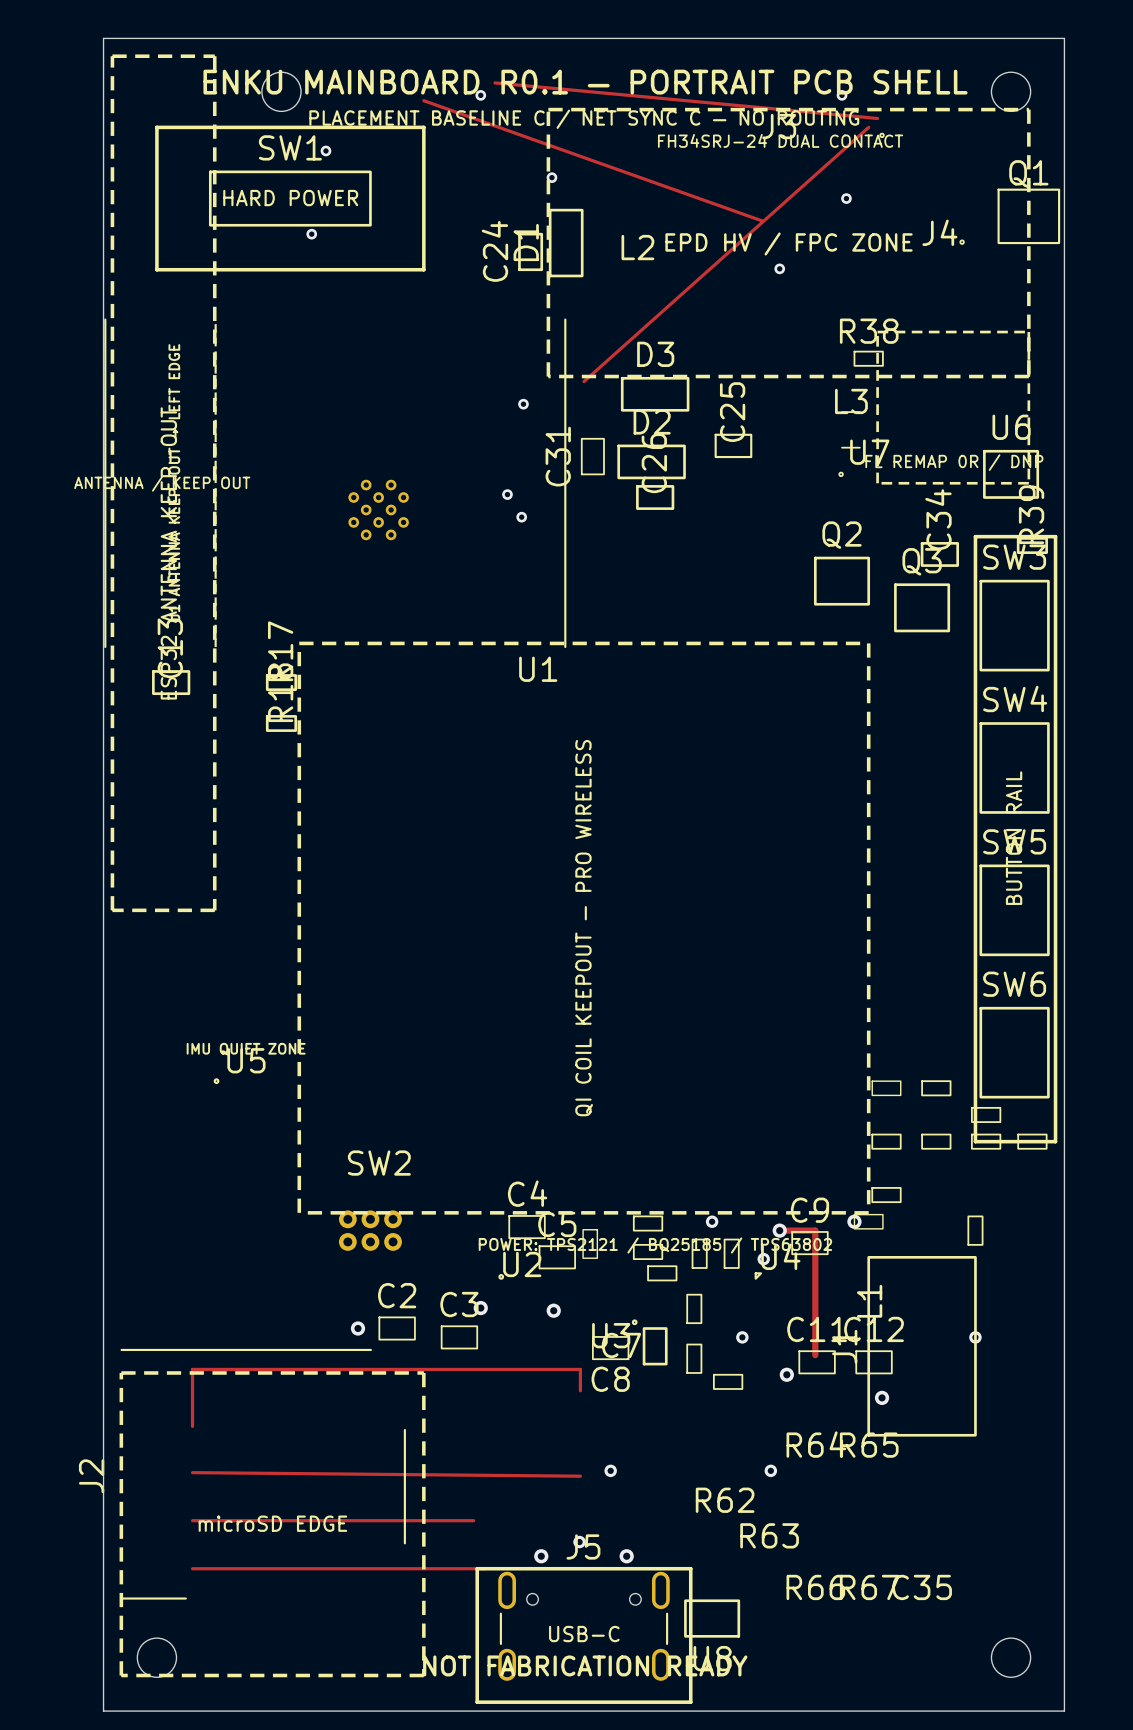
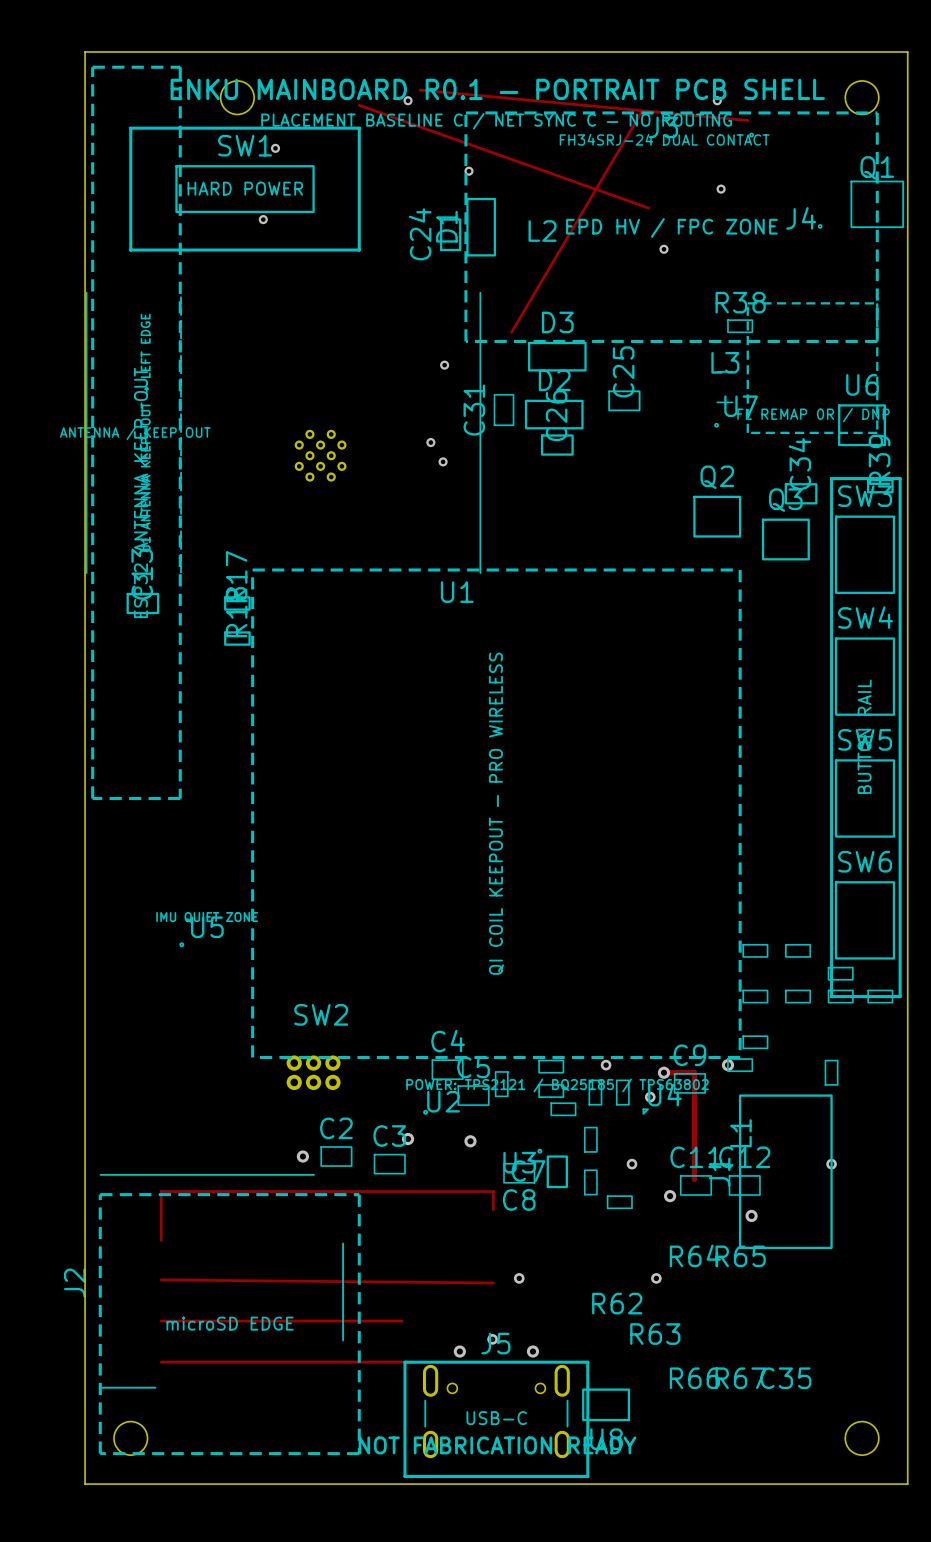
track: none -> (641, 112) (511, 332)
track: (868, 127) (583, 381) -> none

